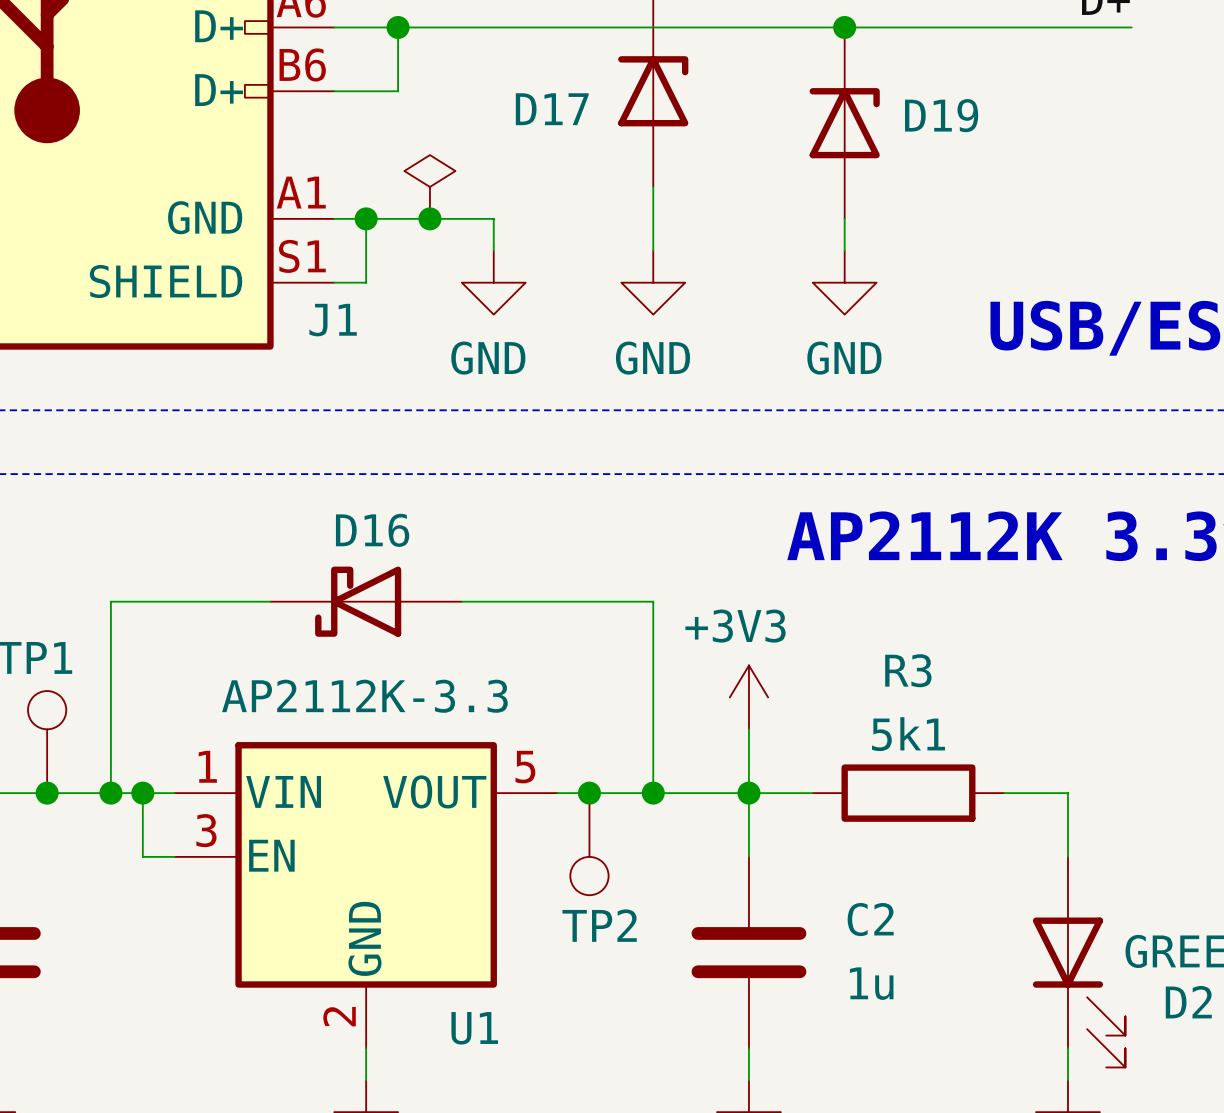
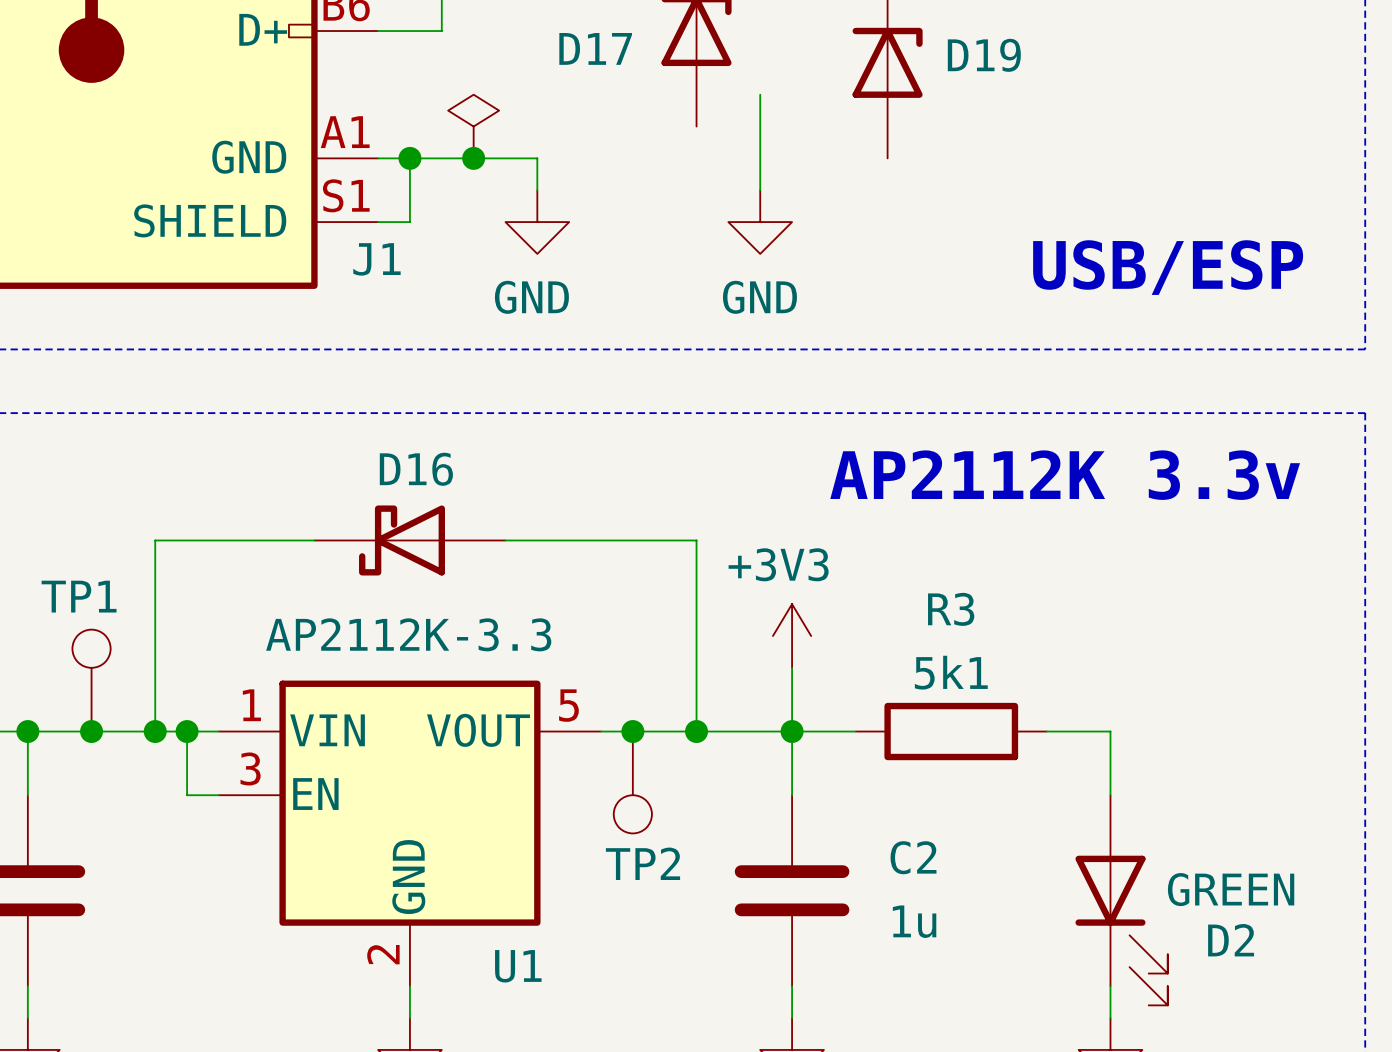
wire: none -> (760, 94) (760, 190)
wire: (653, 186) (653, 250) -> none
wire: (844, 218) (844, 250) -> none
power symbol: GND (653, 282) -> none
power symbol: none -> GND (760, 222)
power symbol: GND (844, 282) -> none

